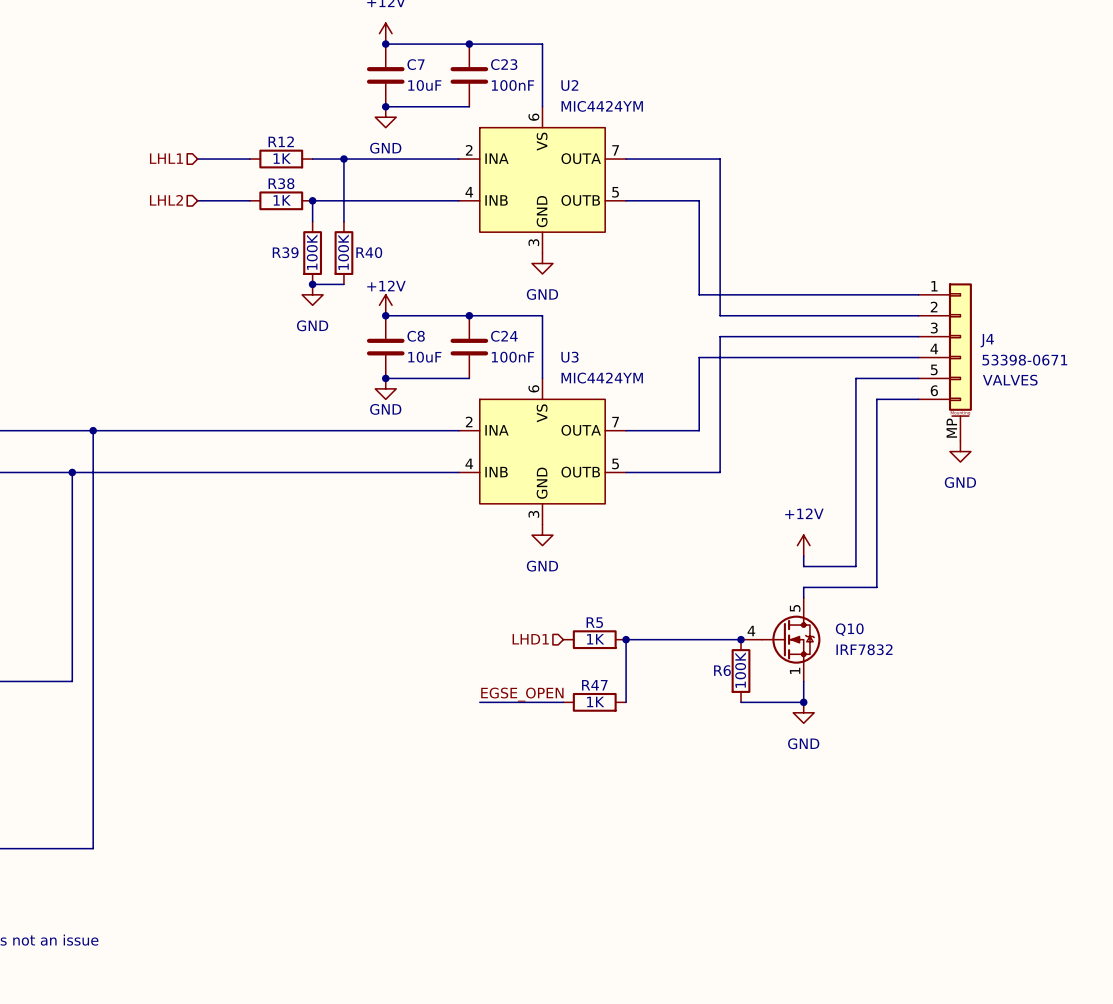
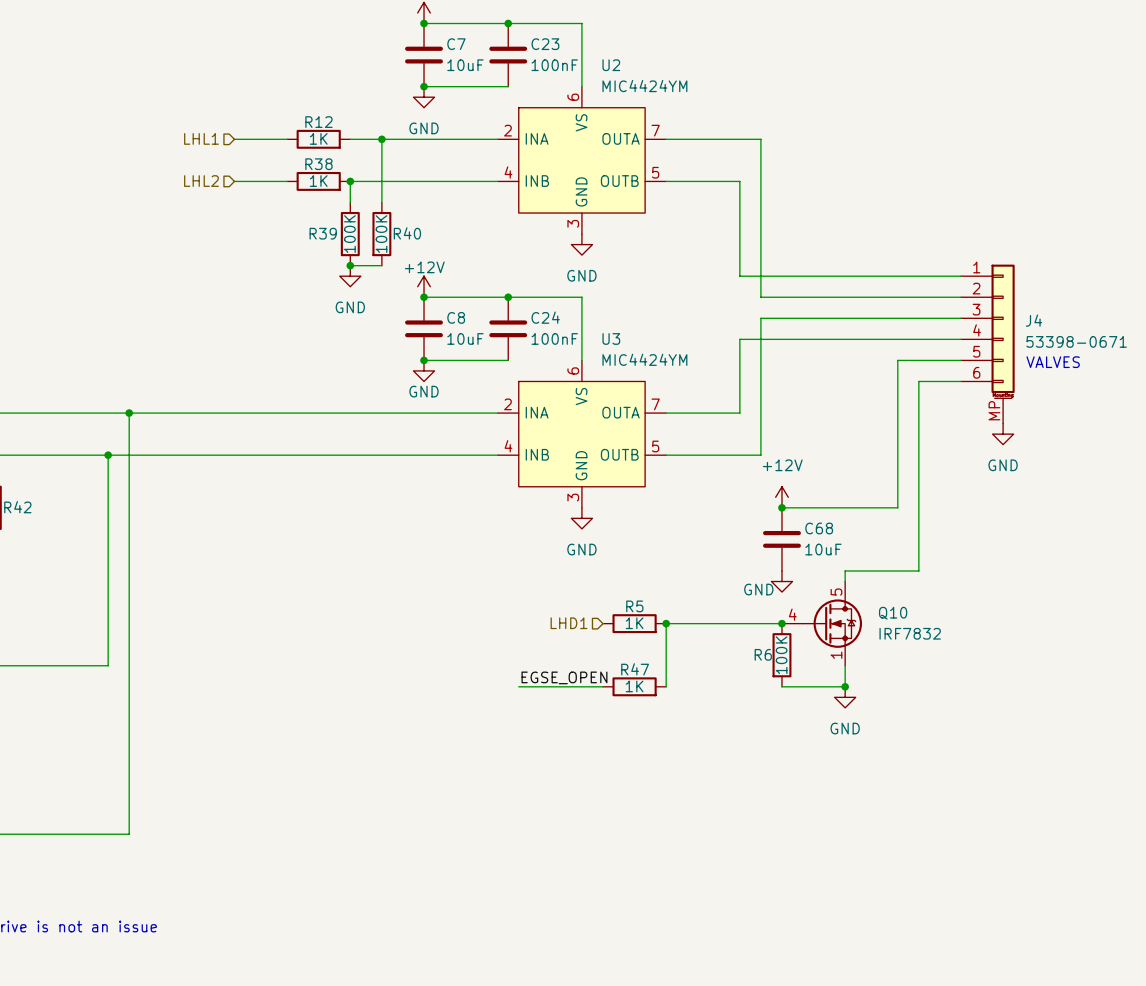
junction: none -> (781, 507)
wire: (855, 524) (855, 566) (803, 566) (803, 556) -> (897, 507) (781, 507)
power symbol position: +12V (803, 545) -> +12V (781, 497)
C68: none -> 10uF (781, 539)
power symbol: none -> GND (781, 581)

